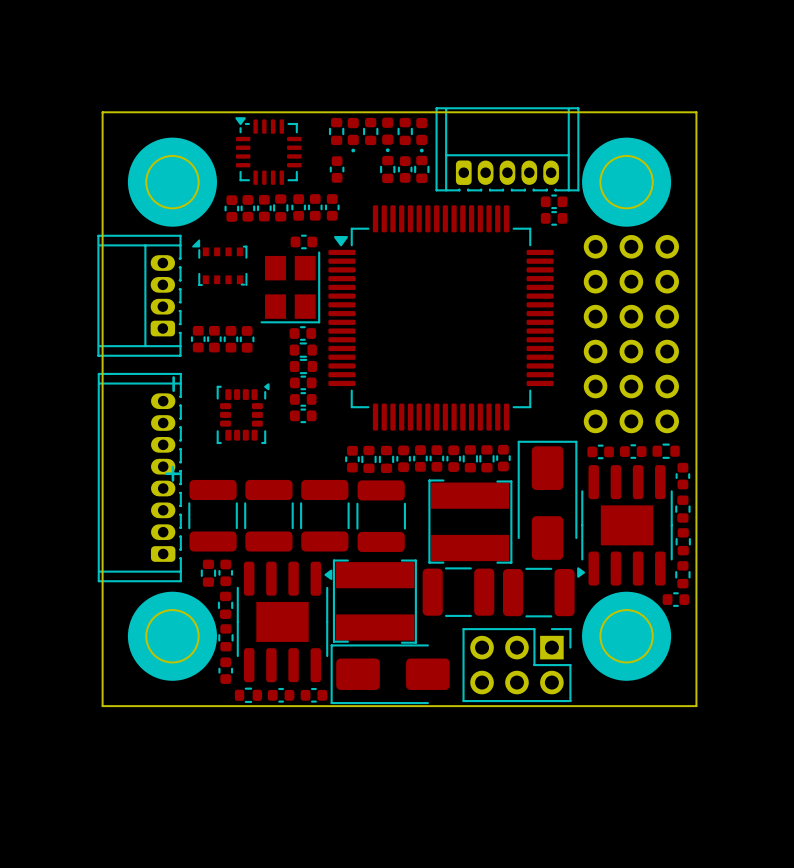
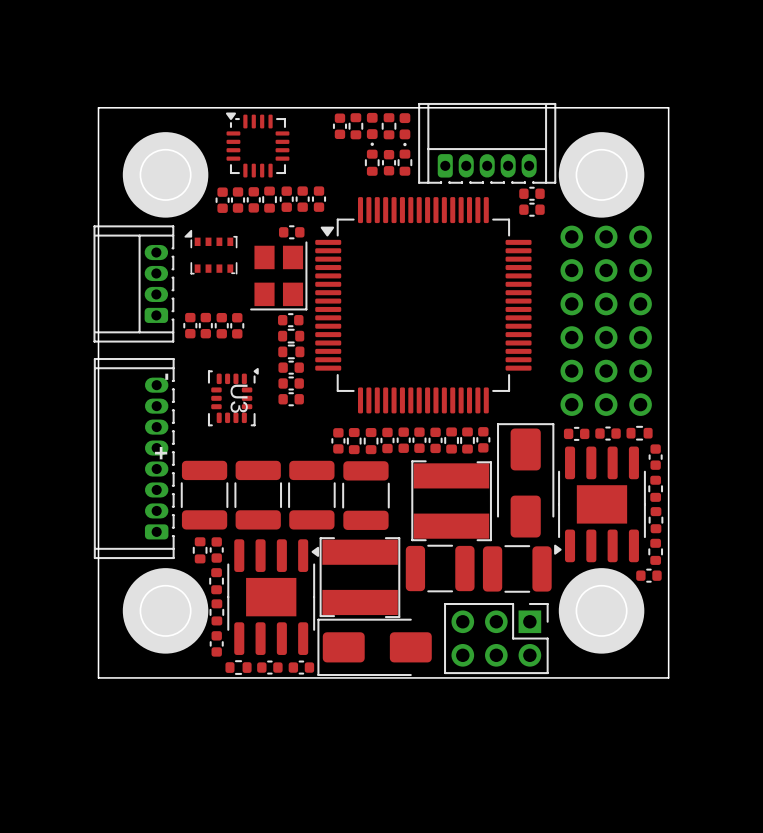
part footprint: [347, 117, 359, 153] -> [332, 113, 348, 140]
part: (336, 131) -> none
part: (337, 169) -> none
part: (243, 413) -> none
U3: none -> (233, 397)

